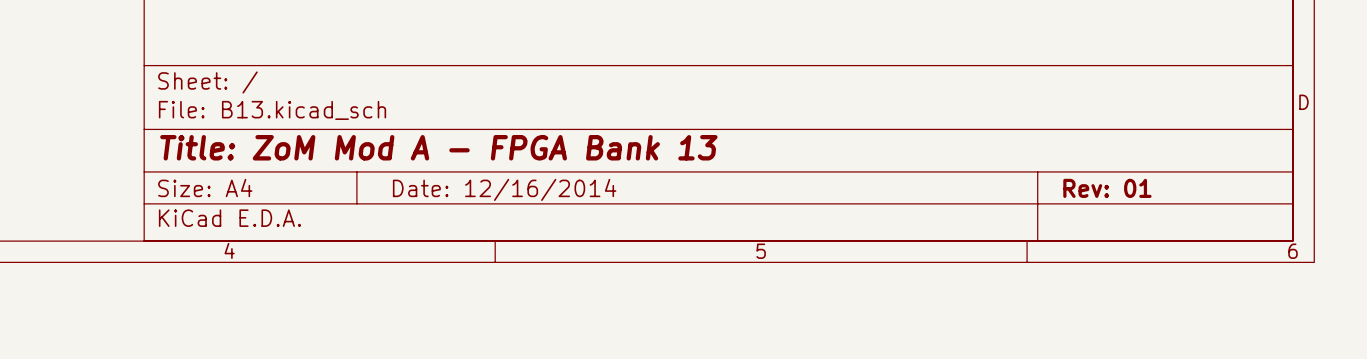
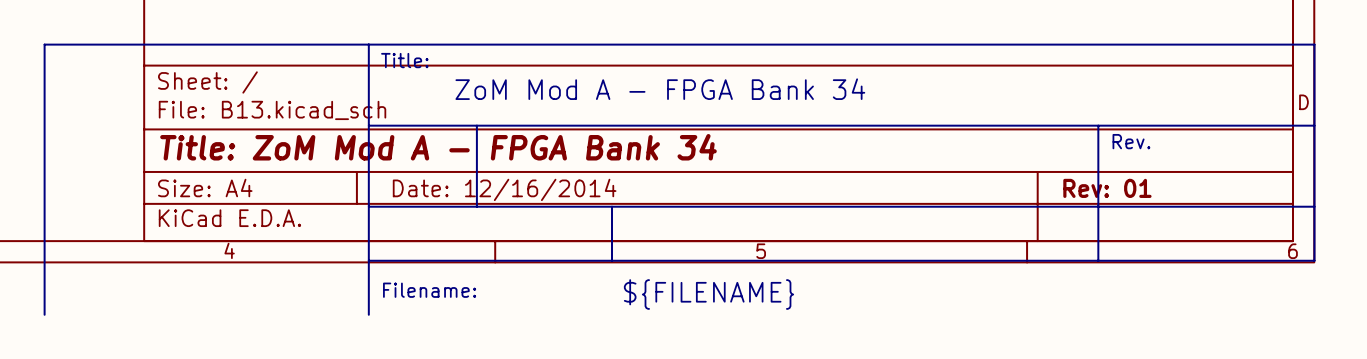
line: none -> (368, 44) (368, 314)
text: none -> Title: (404, 60)
text: none -> ZoM Mod A - FPGA Bank 34 (660, 89)
line: none -> (368, 125) (1314, 125)
line: none -> (476, 125) (476, 206)
line: none -> (1098, 125) (1098, 260)
text: none -> Rev. (1131, 141)
title block: Title: ZoM Mod A - FPGA Bank 13 (438, 147) -> Title: ZoM Mod A - FPGA Bank 34 (438, 147)
line: none -> (368, 206) (1314, 206)
line: none -> (612, 206) (612, 260)
line: none -> (368, 260) (1314, 260) (1314, 44) (44, 44) (44, 314)
text: none -> Filename: (429, 290)
text: none -> ${FILENAME} (708, 294)

